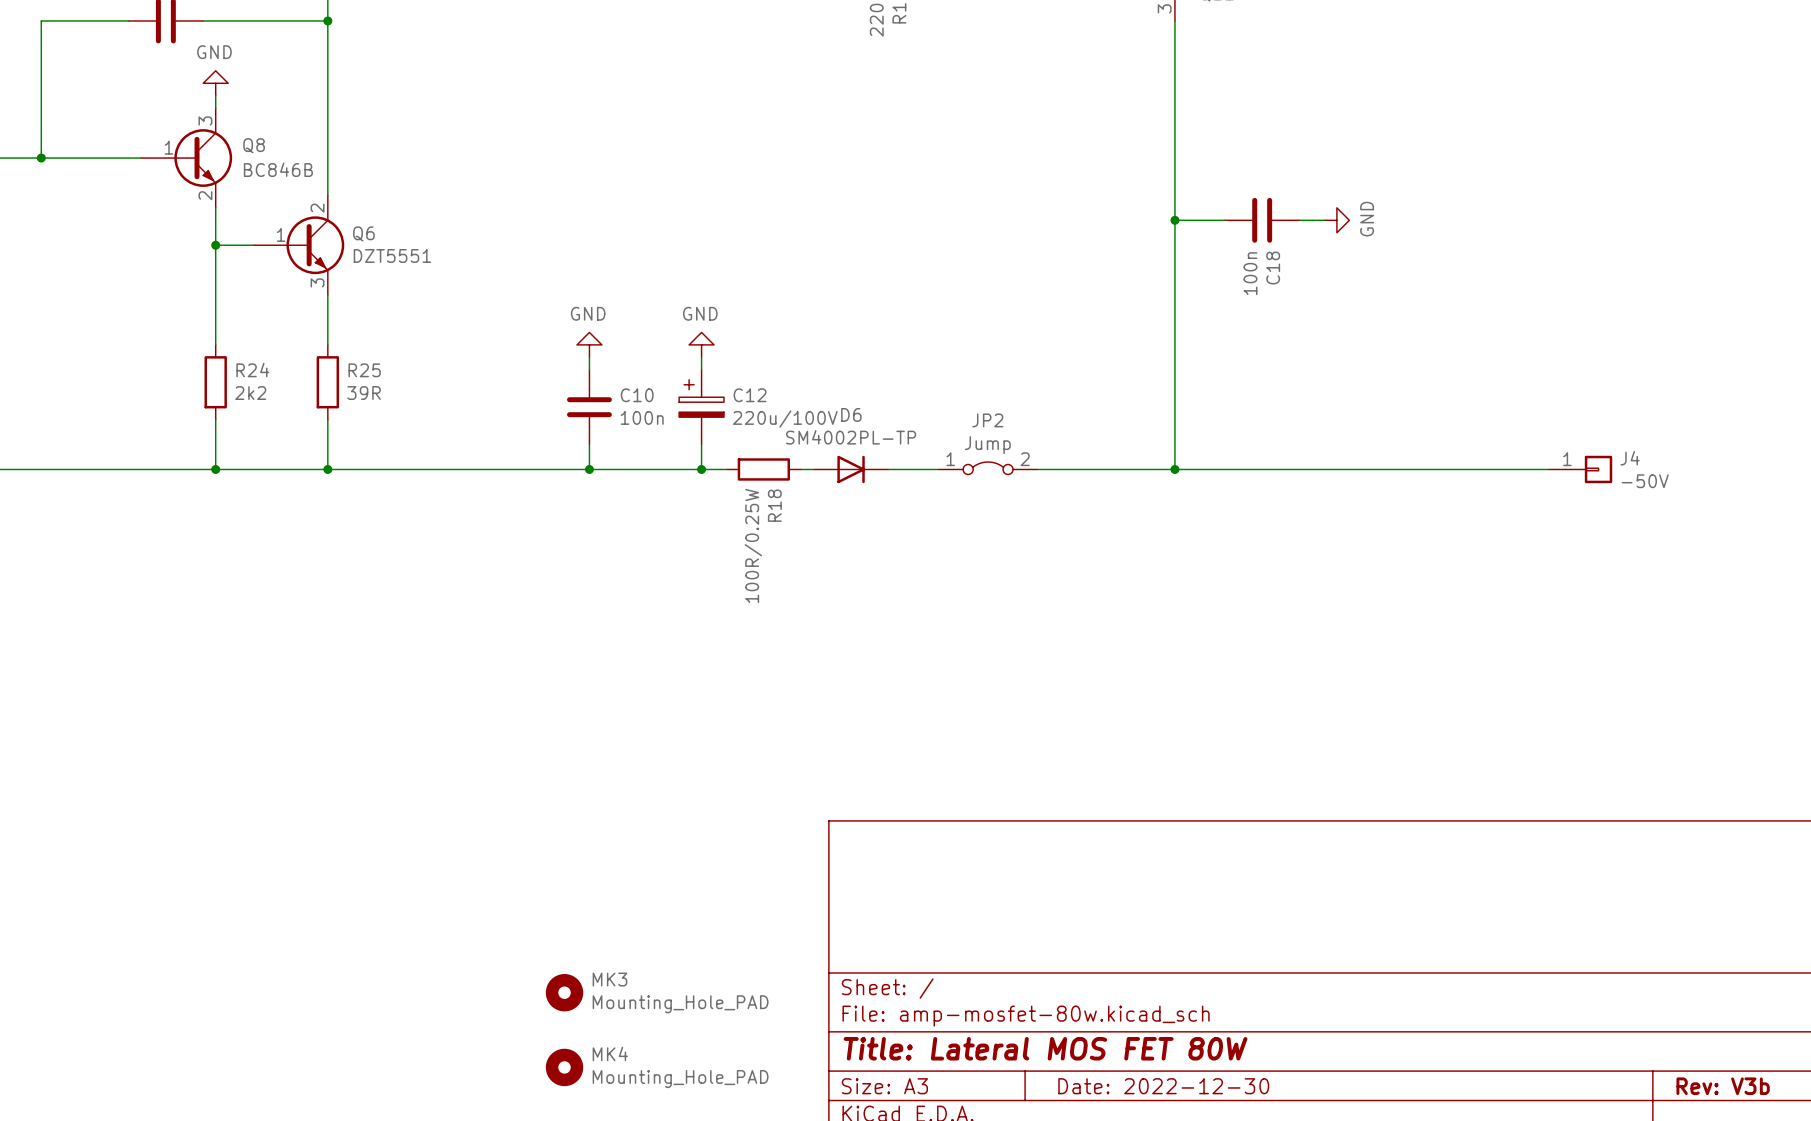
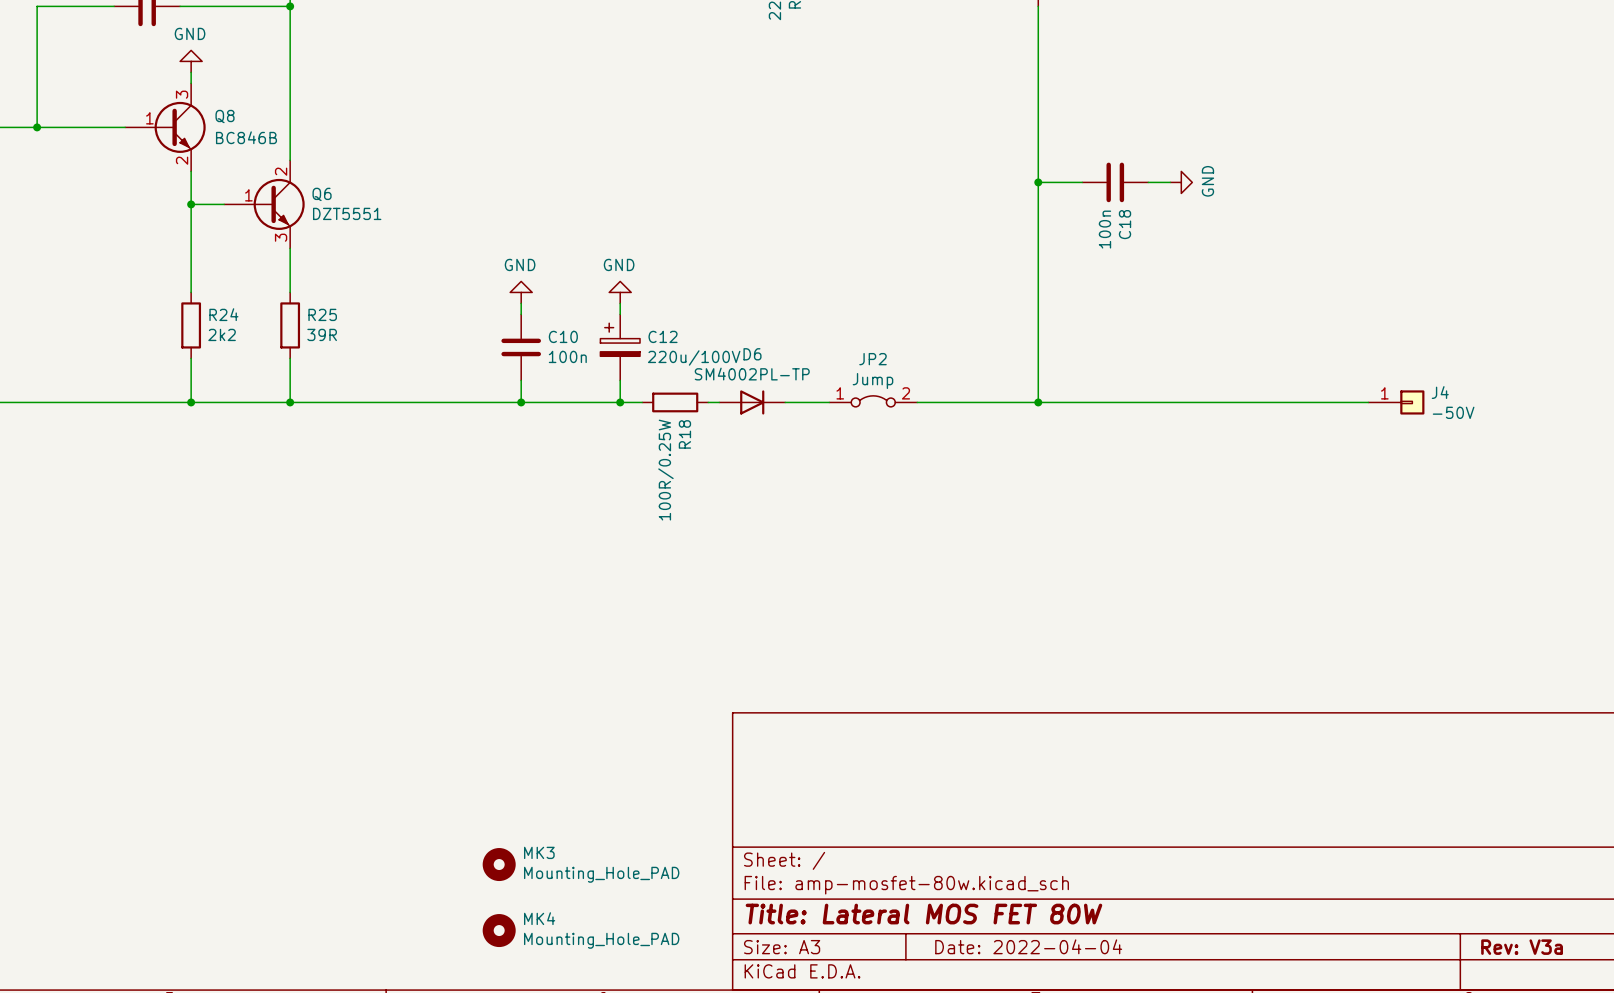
title block: Date: 2022-12-30 (1163, 1086) -> Date: 2022-04-04 (1028, 946)
title block: Rev: V3b (1723, 1086) -> Rev: V3a (1522, 947)

